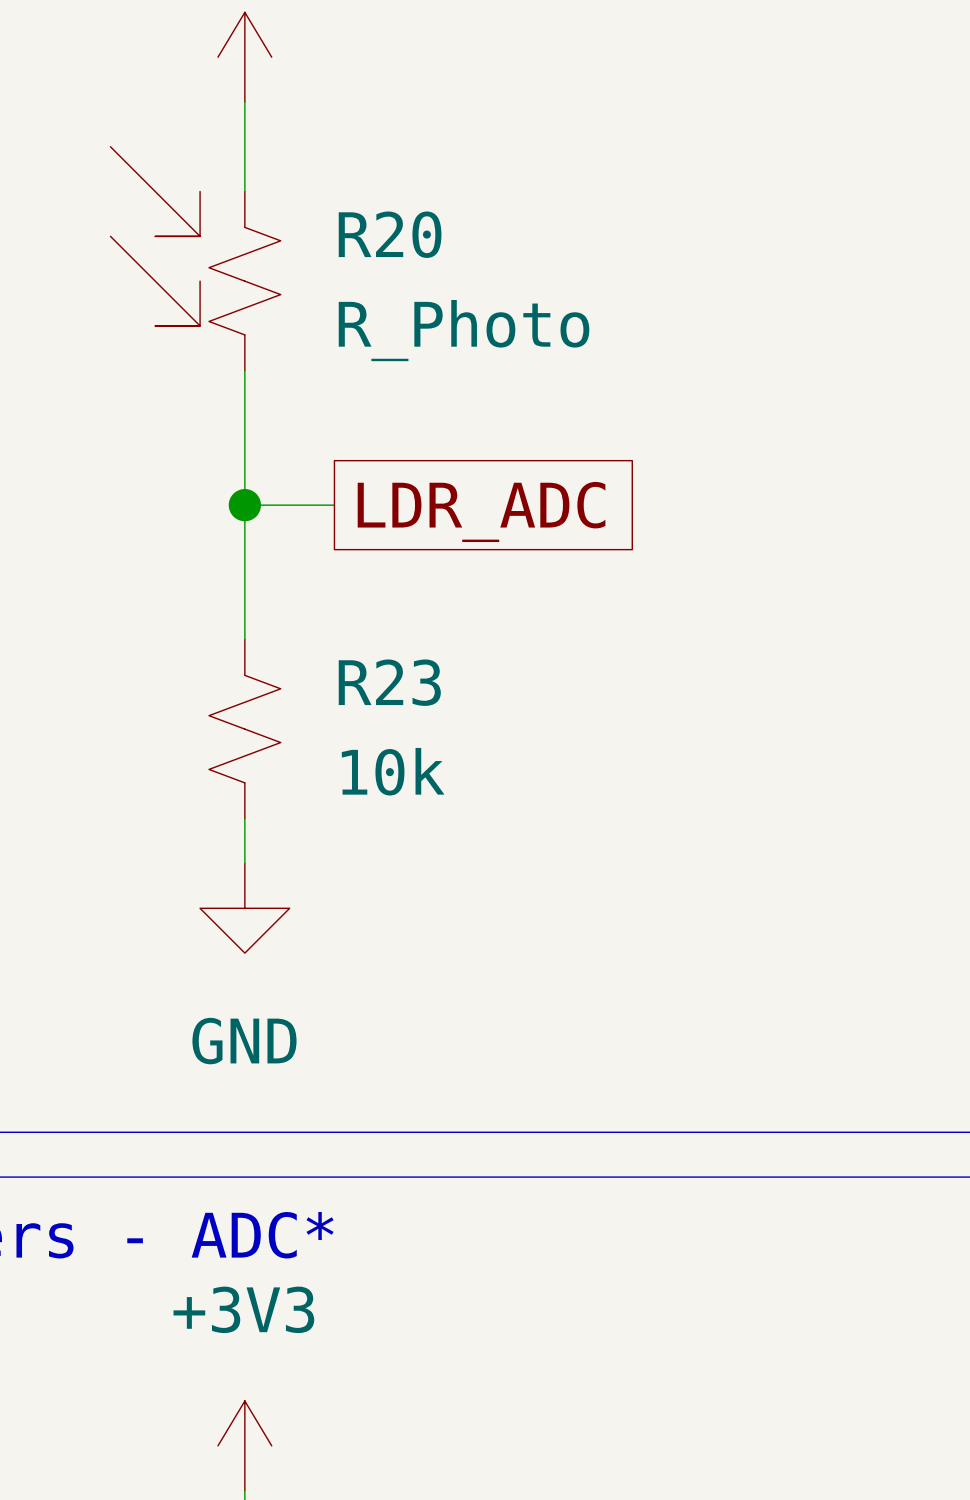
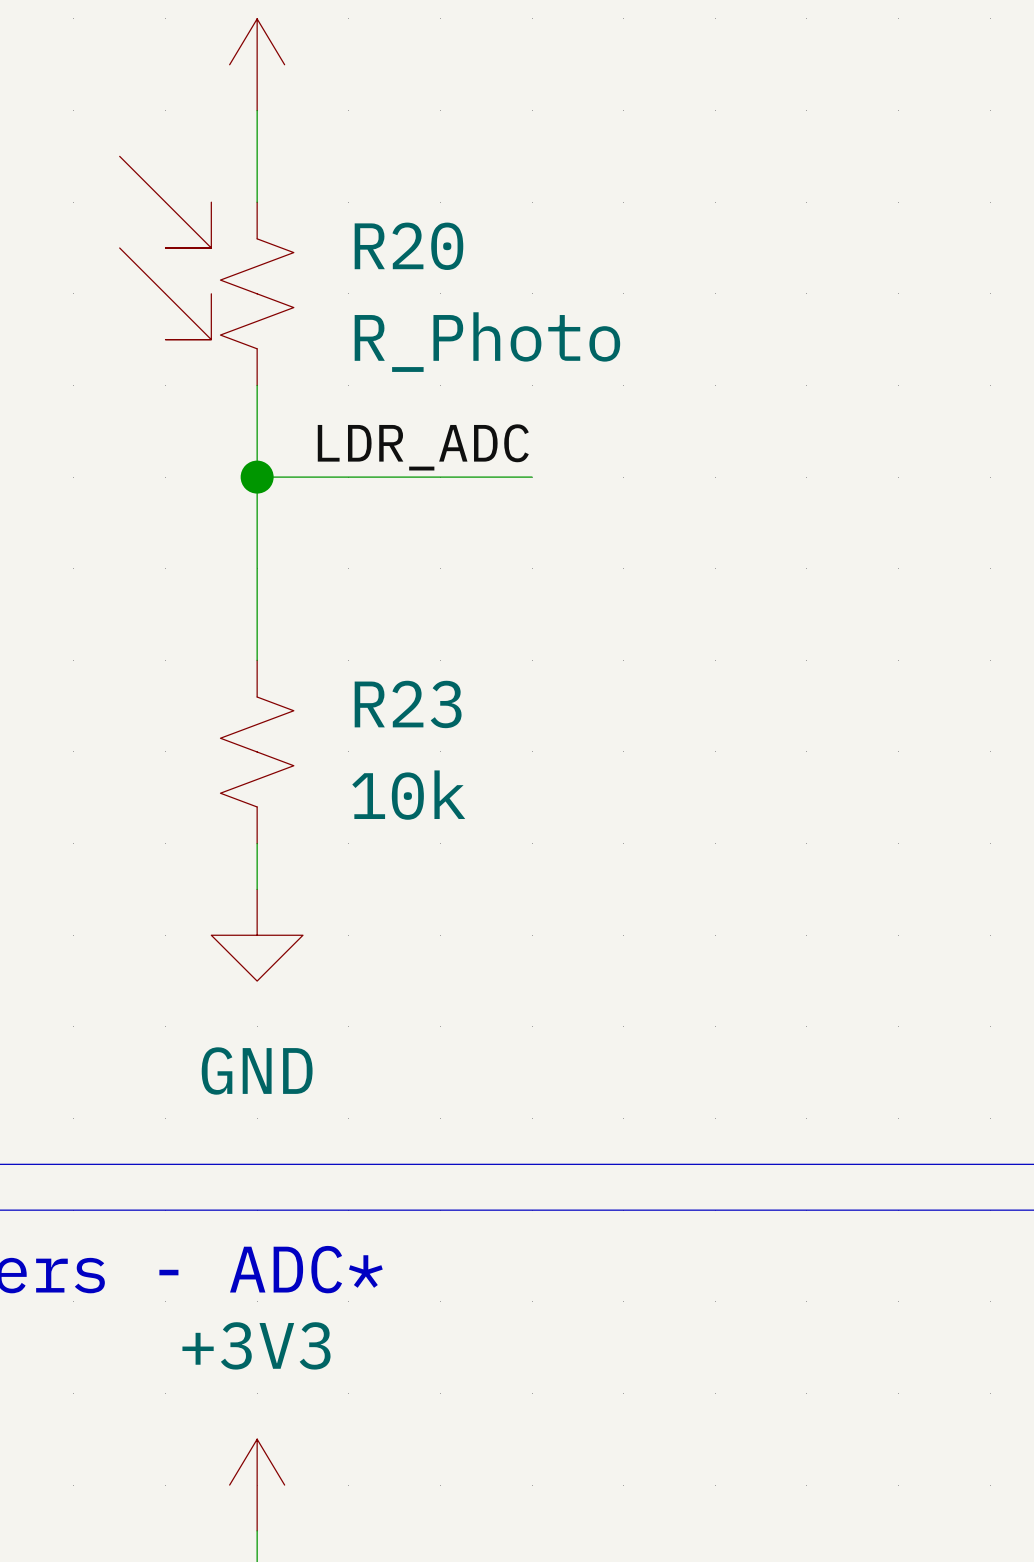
label: none -> LDR_ADC (423, 447)
wire: none -> (257, 477) (532, 477)
wire: (244, 505) (334, 505) -> none
junction position: (244, 505) -> (257, 477)
global label: LDR_ADC (481, 511) -> none

